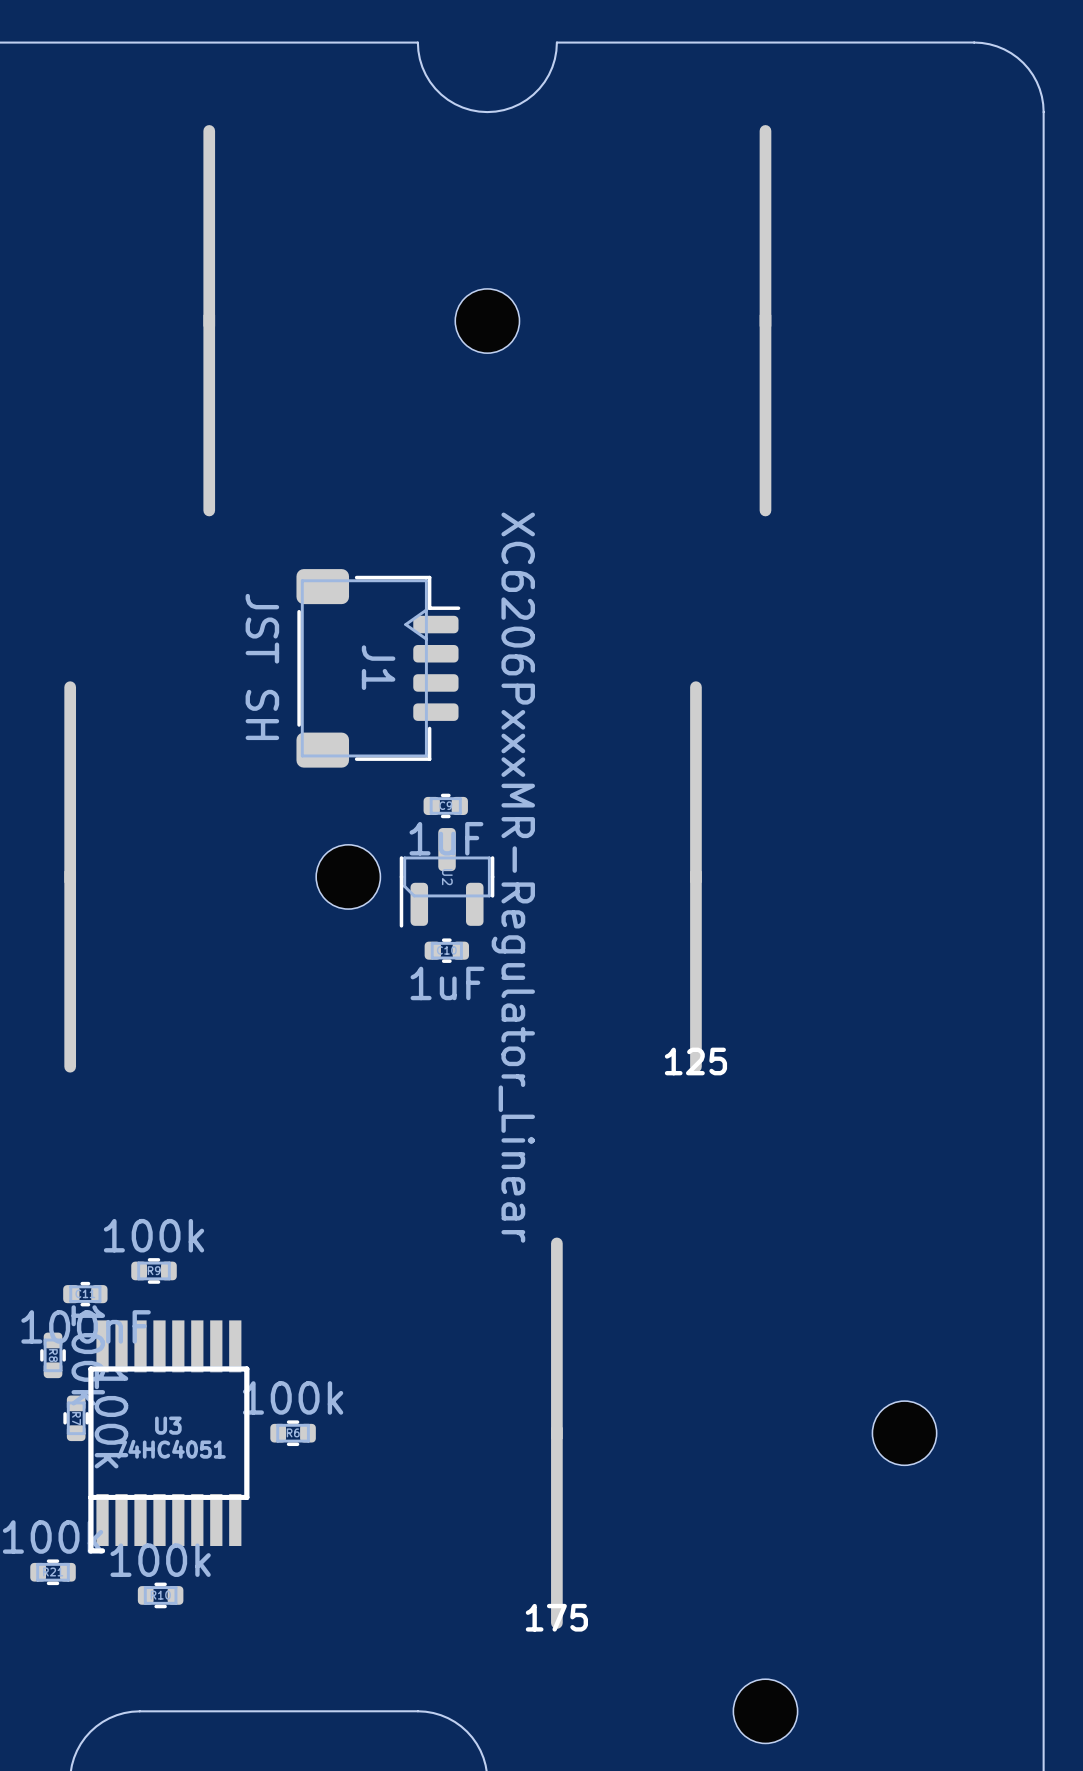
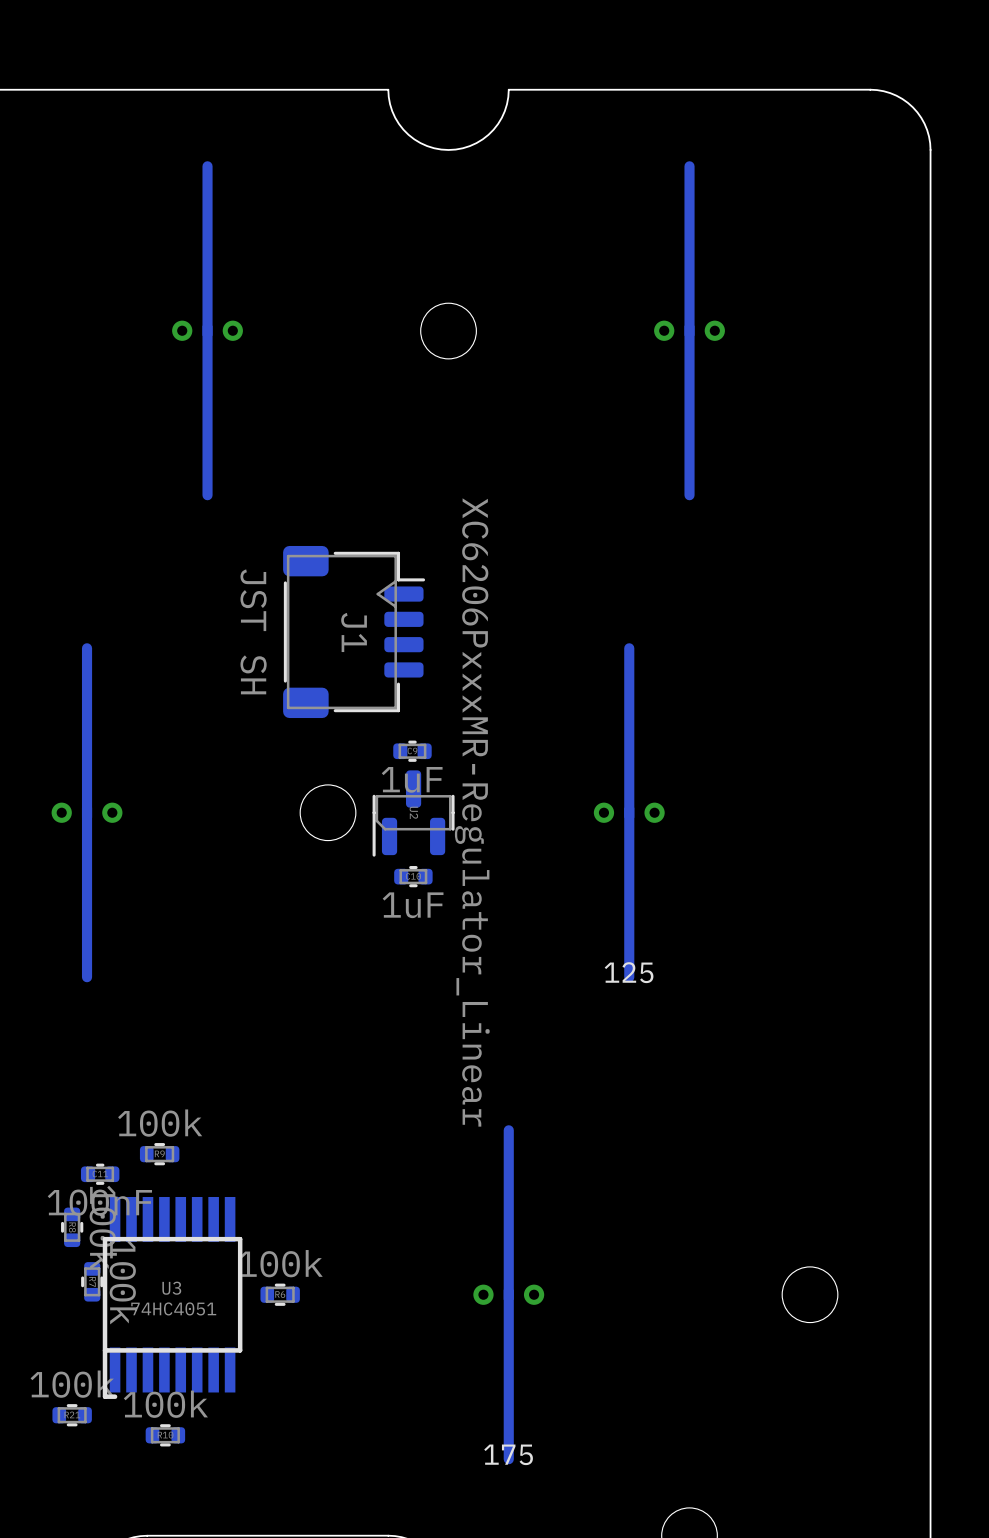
part footprint: [203, 125, 216, 517] -> [172, 161, 243, 501]
part footprint: [759, 125, 772, 517] -> [654, 161, 725, 501]
part footprint: [64, 681, 77, 1073] -> [51, 643, 123, 983]
part footprint: [690, 681, 702, 1073] -> [593, 643, 665, 983]
part footprint: [551, 1237, 563, 1629] -> [473, 1125, 545, 1465]

